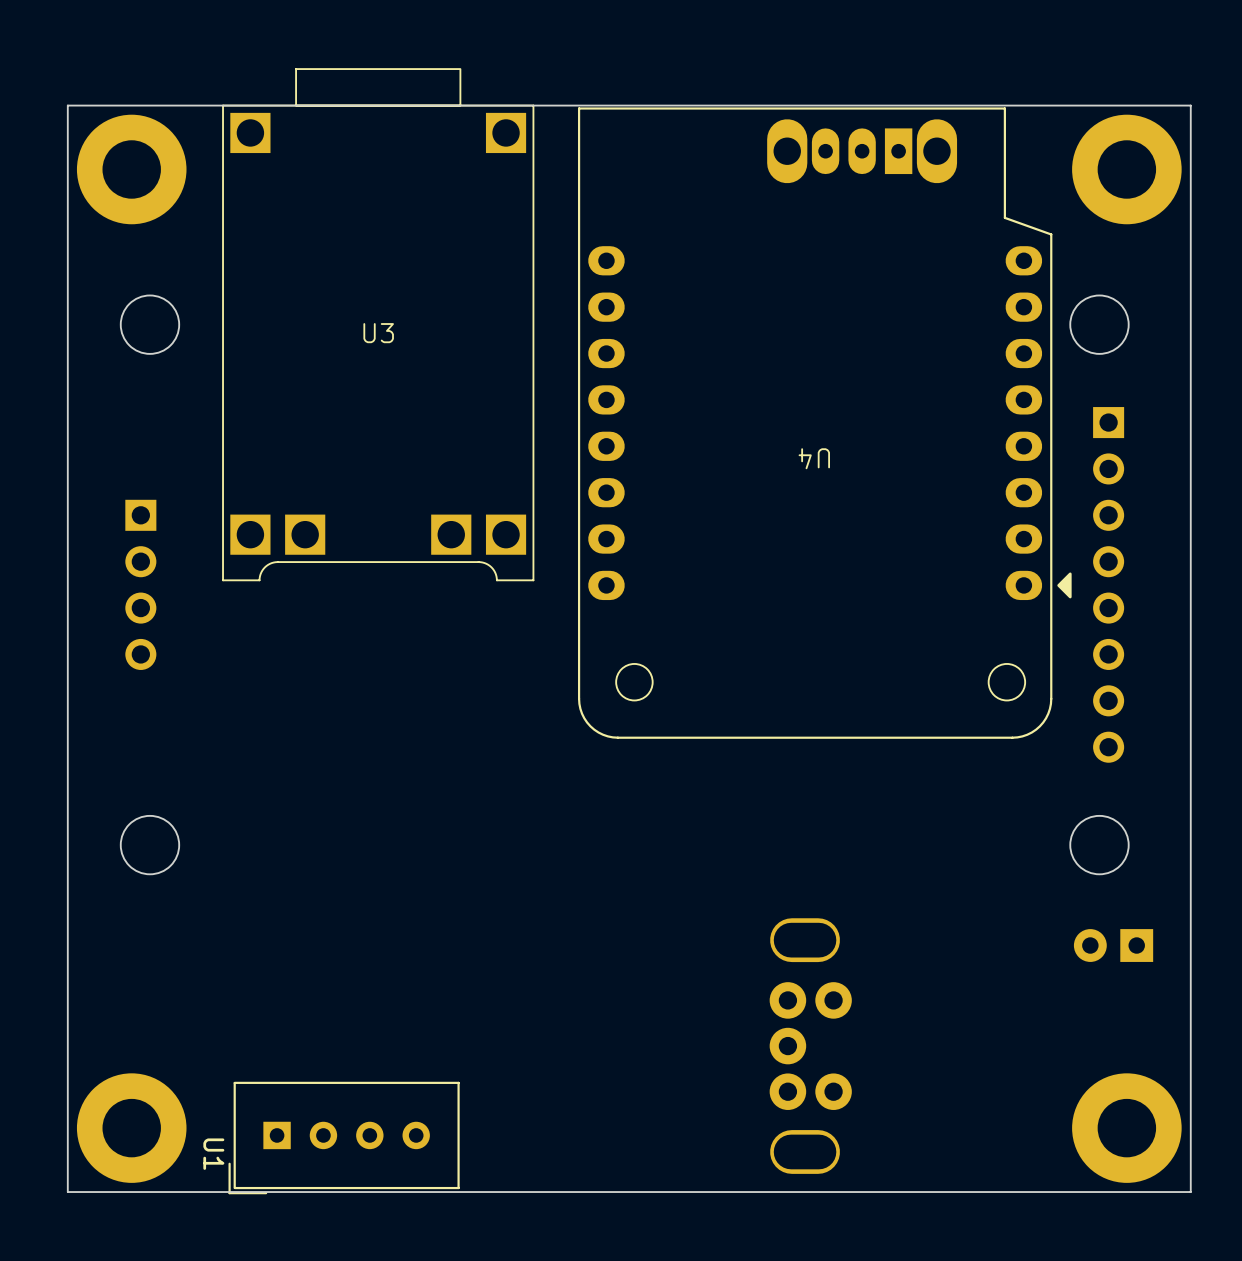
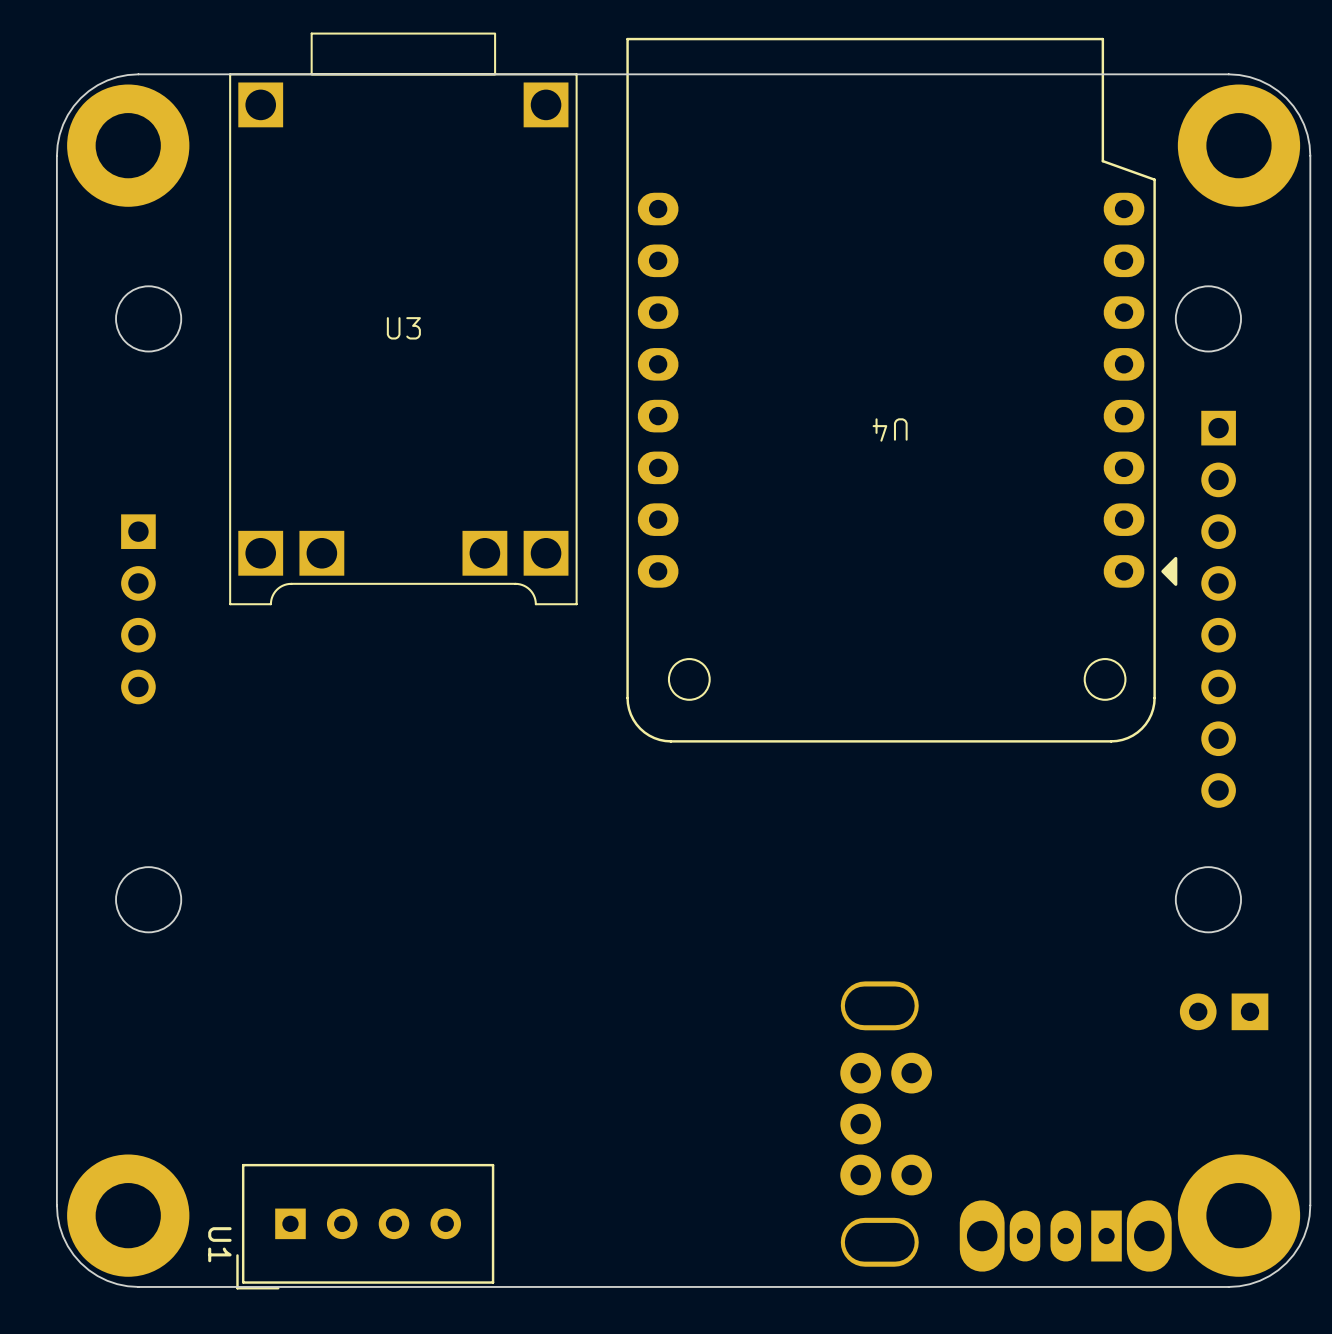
board edge: (140, 105) (67, 105) (67, 178) -> (138, 74) (107, 80) (80, 98) (63, 124) (56, 155)
board edge: (1117, 105) (1190, 105) (1190, 178) -> (1228, 74) (1259, 80) (1286, 98) (1304, 124) (1310, 155)
part: (862, 151) -> none
U4 position: (824, 423) -> (901, 390)
board edge: (67, 1118) (67, 1192) (140, 1192) -> (56, 1205) (63, 1236) (80, 1263) (107, 1280) (138, 1286)
board edge: (1190, 1118) (1190, 1192) (1117, 1192) -> (1310, 1205) (1304, 1236) (1286, 1263) (1259, 1280) (1228, 1286)
part: none -> (1065, 1236)

